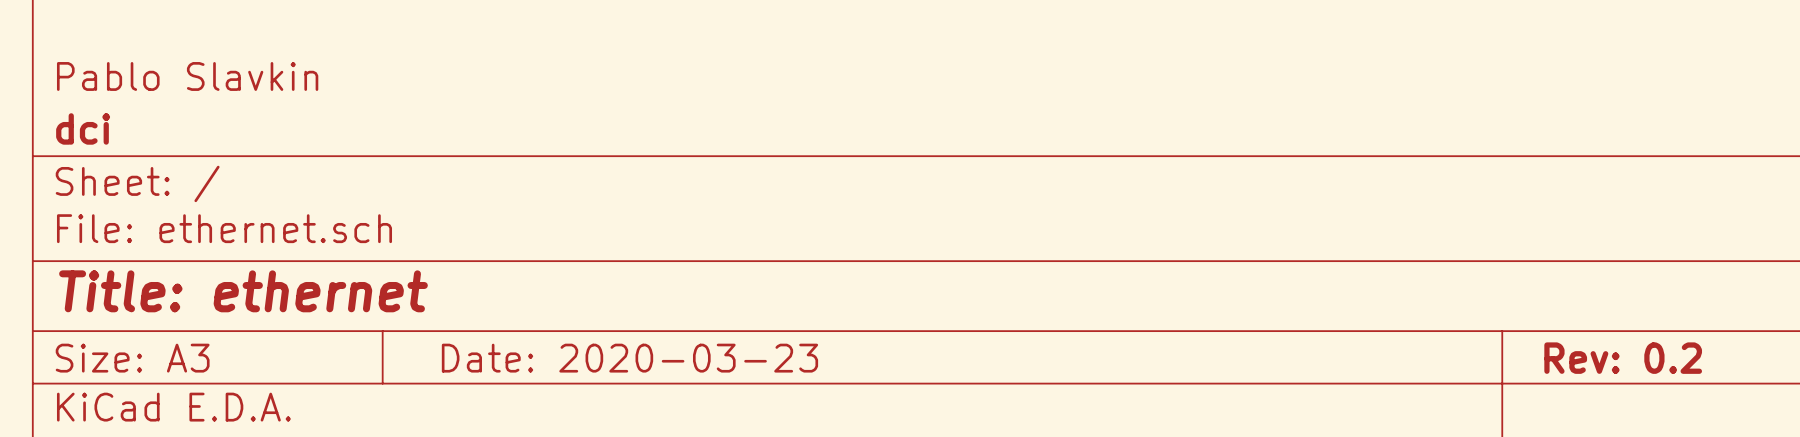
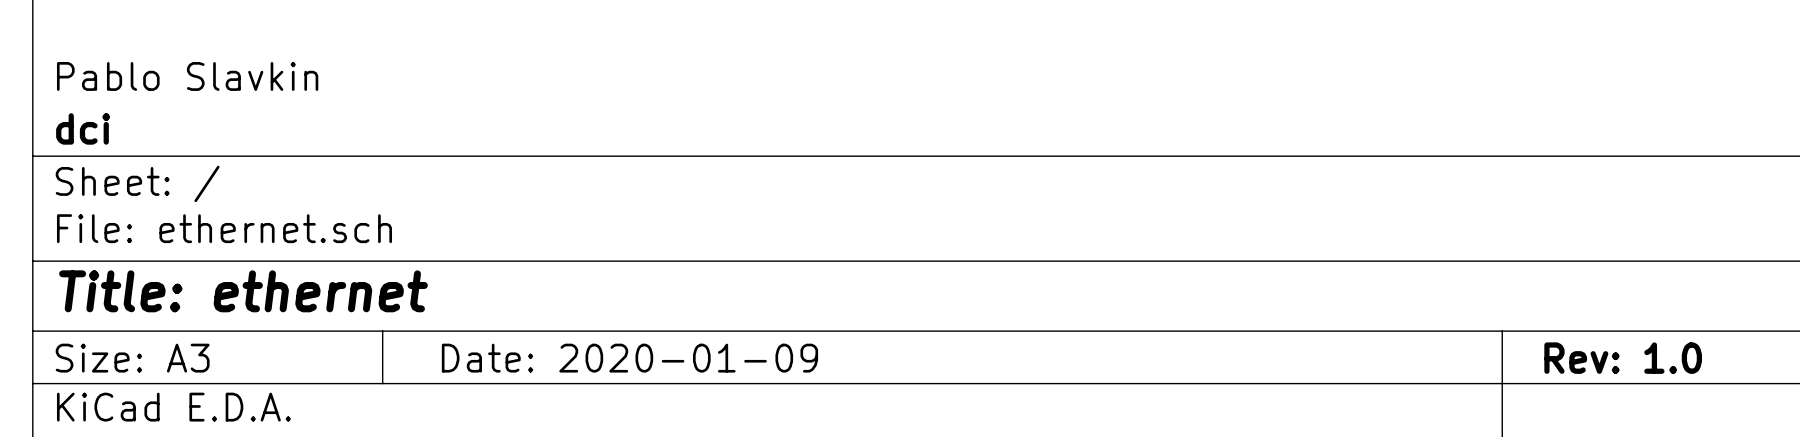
title block: Date: 2020-03-23 (629, 358) -> Date: 2020-01-09 (629, 358)
title block: Rev: 0.2 (1623, 358) -> Rev: 1.0 (1623, 358)

